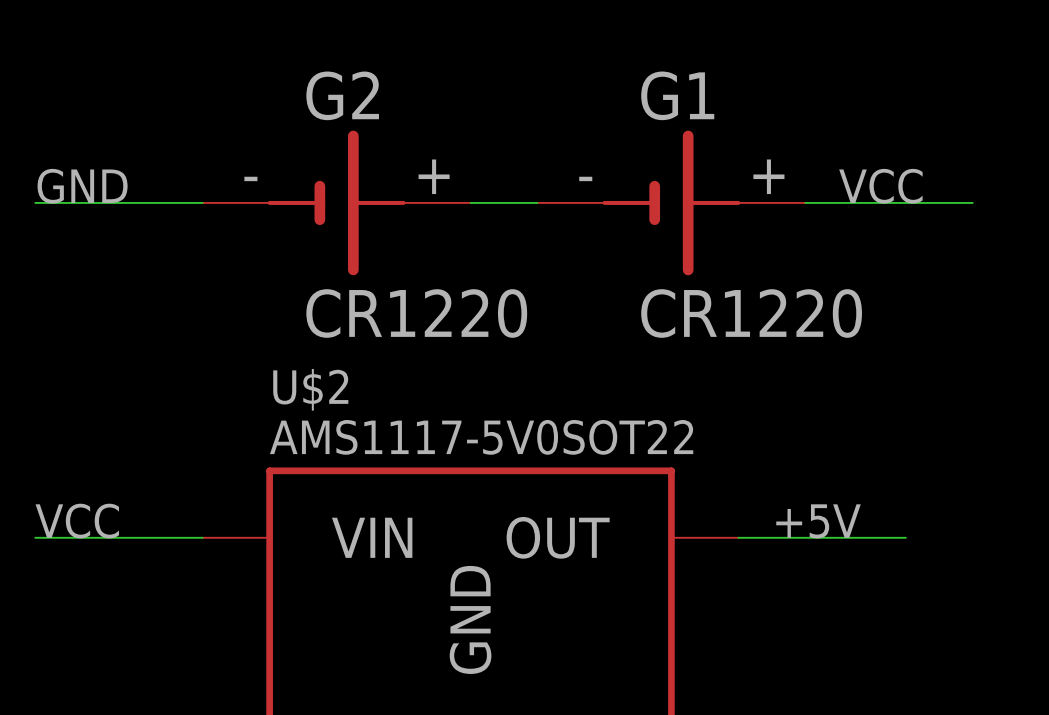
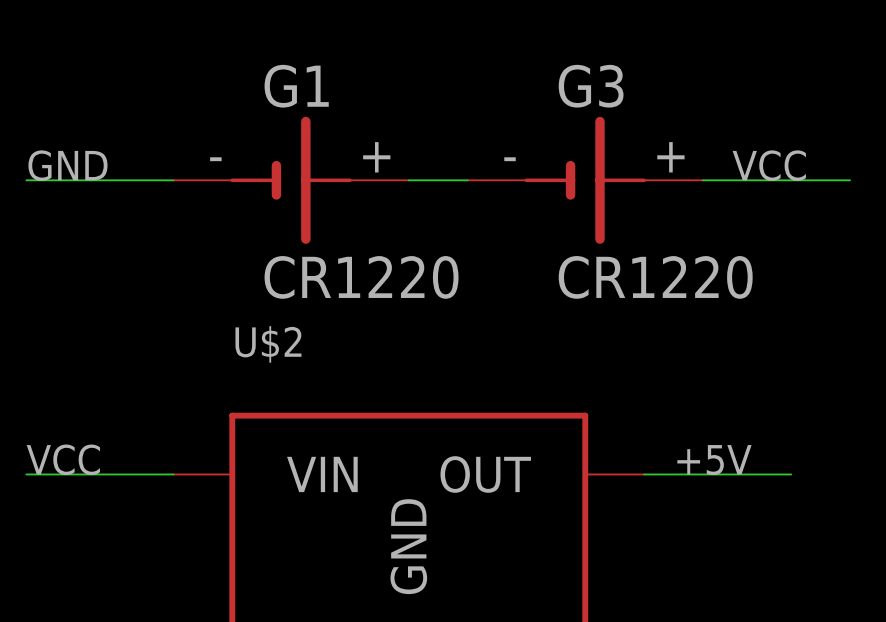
G2 name: G2 (342, 95) -> G1 (296, 86)
G1 name: G1 (677, 95) -> G3 (591, 86)
U$2 value: AMS1117-5V0SOT22 (481, 437) -> none

